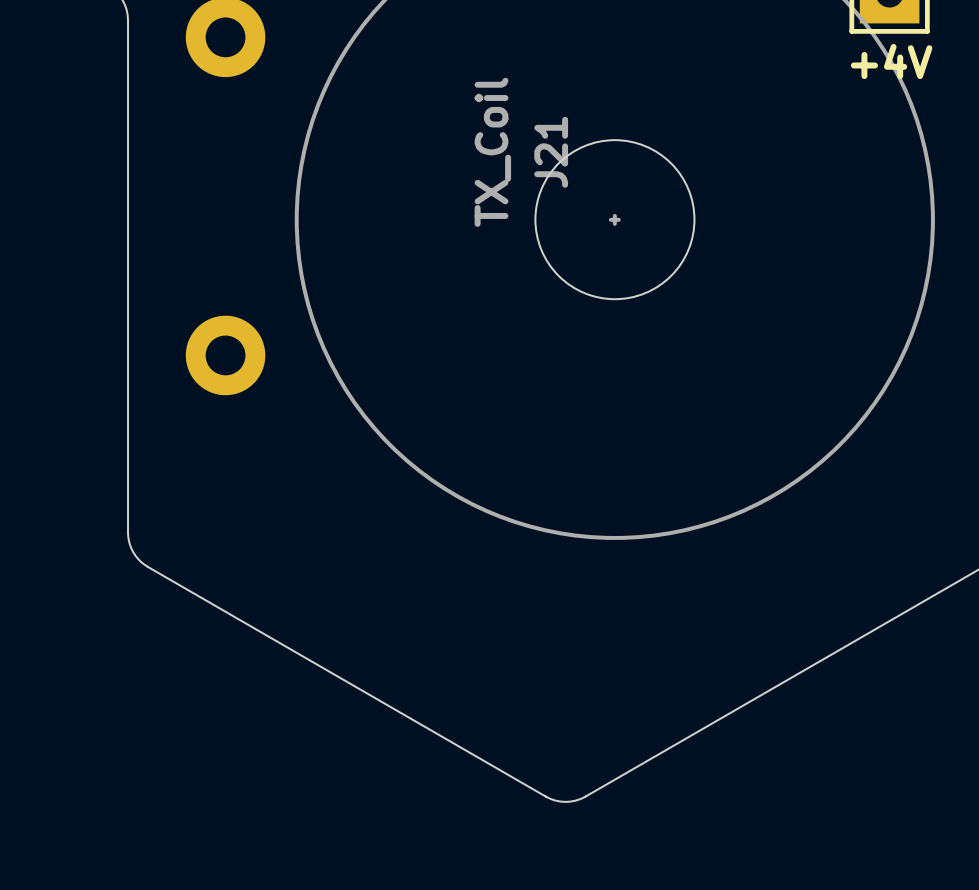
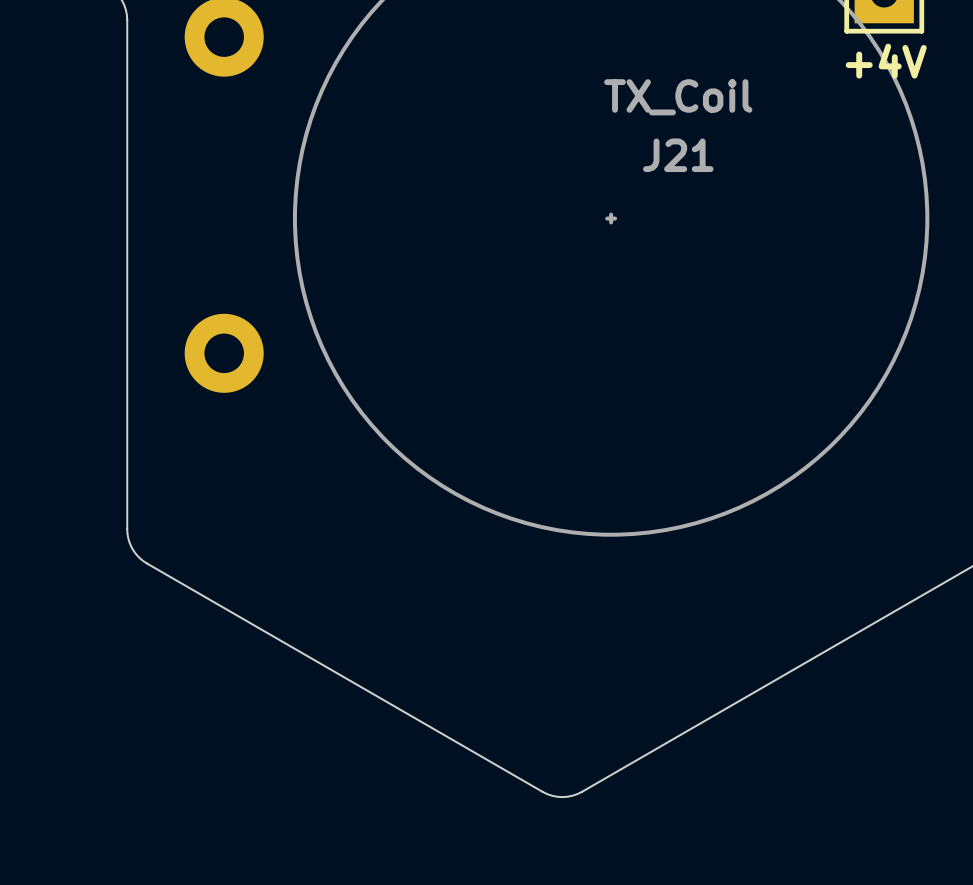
round board edge: [534, 139, 696, 301] -> none
J21 value rotation: 0° (492, 152) -> 90° clockwise (678, 97)
J21 name rotation: 0° (551, 152) -> 90° clockwise (678, 155)
J21 name position: J21 (551, 152) -> J21 (678, 155)

